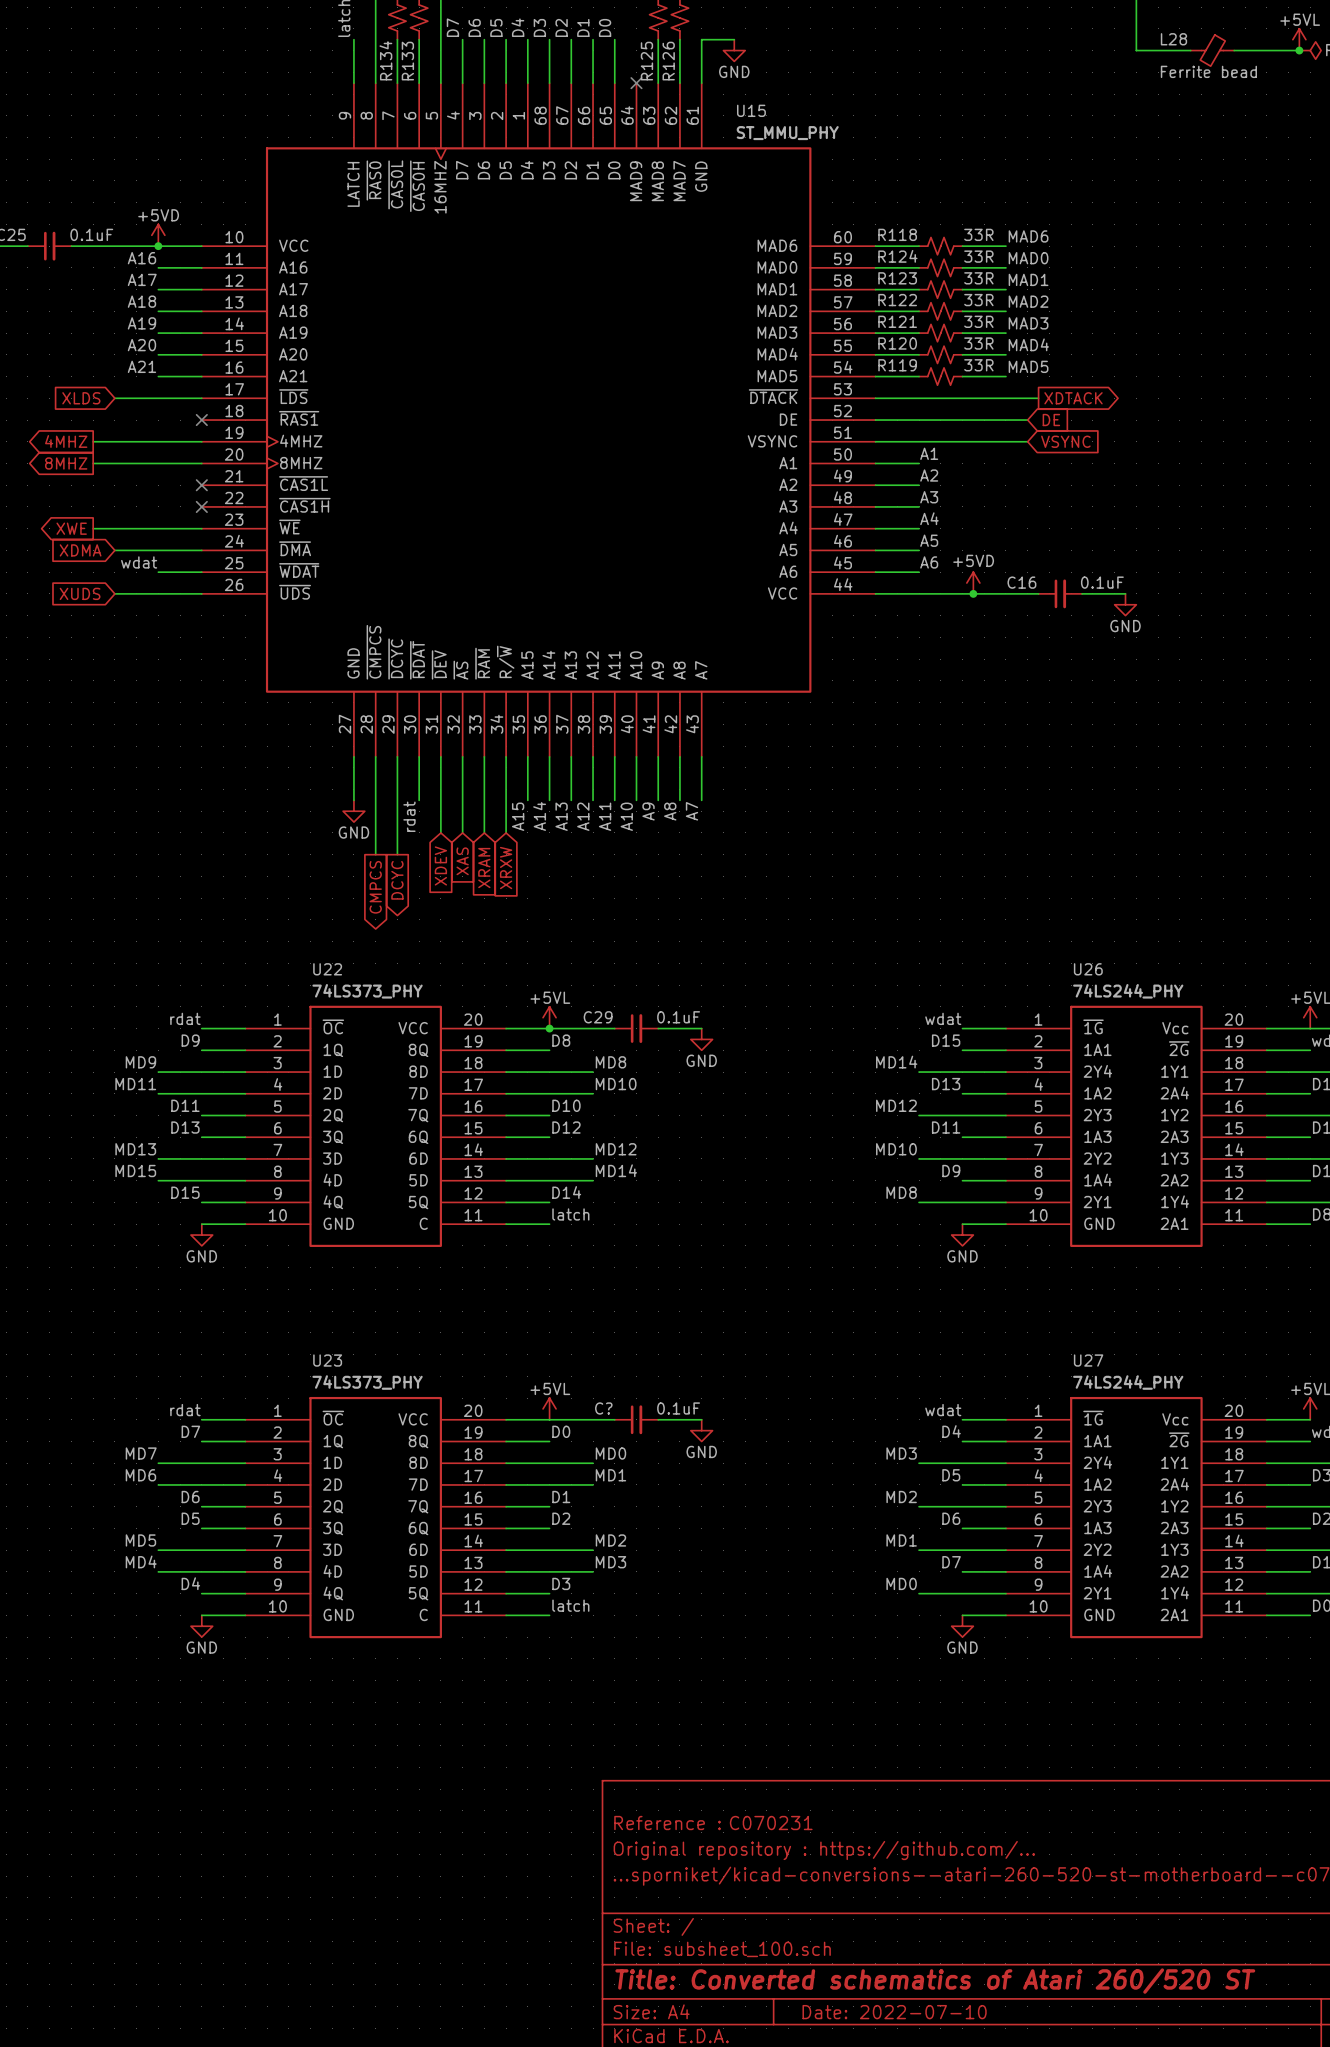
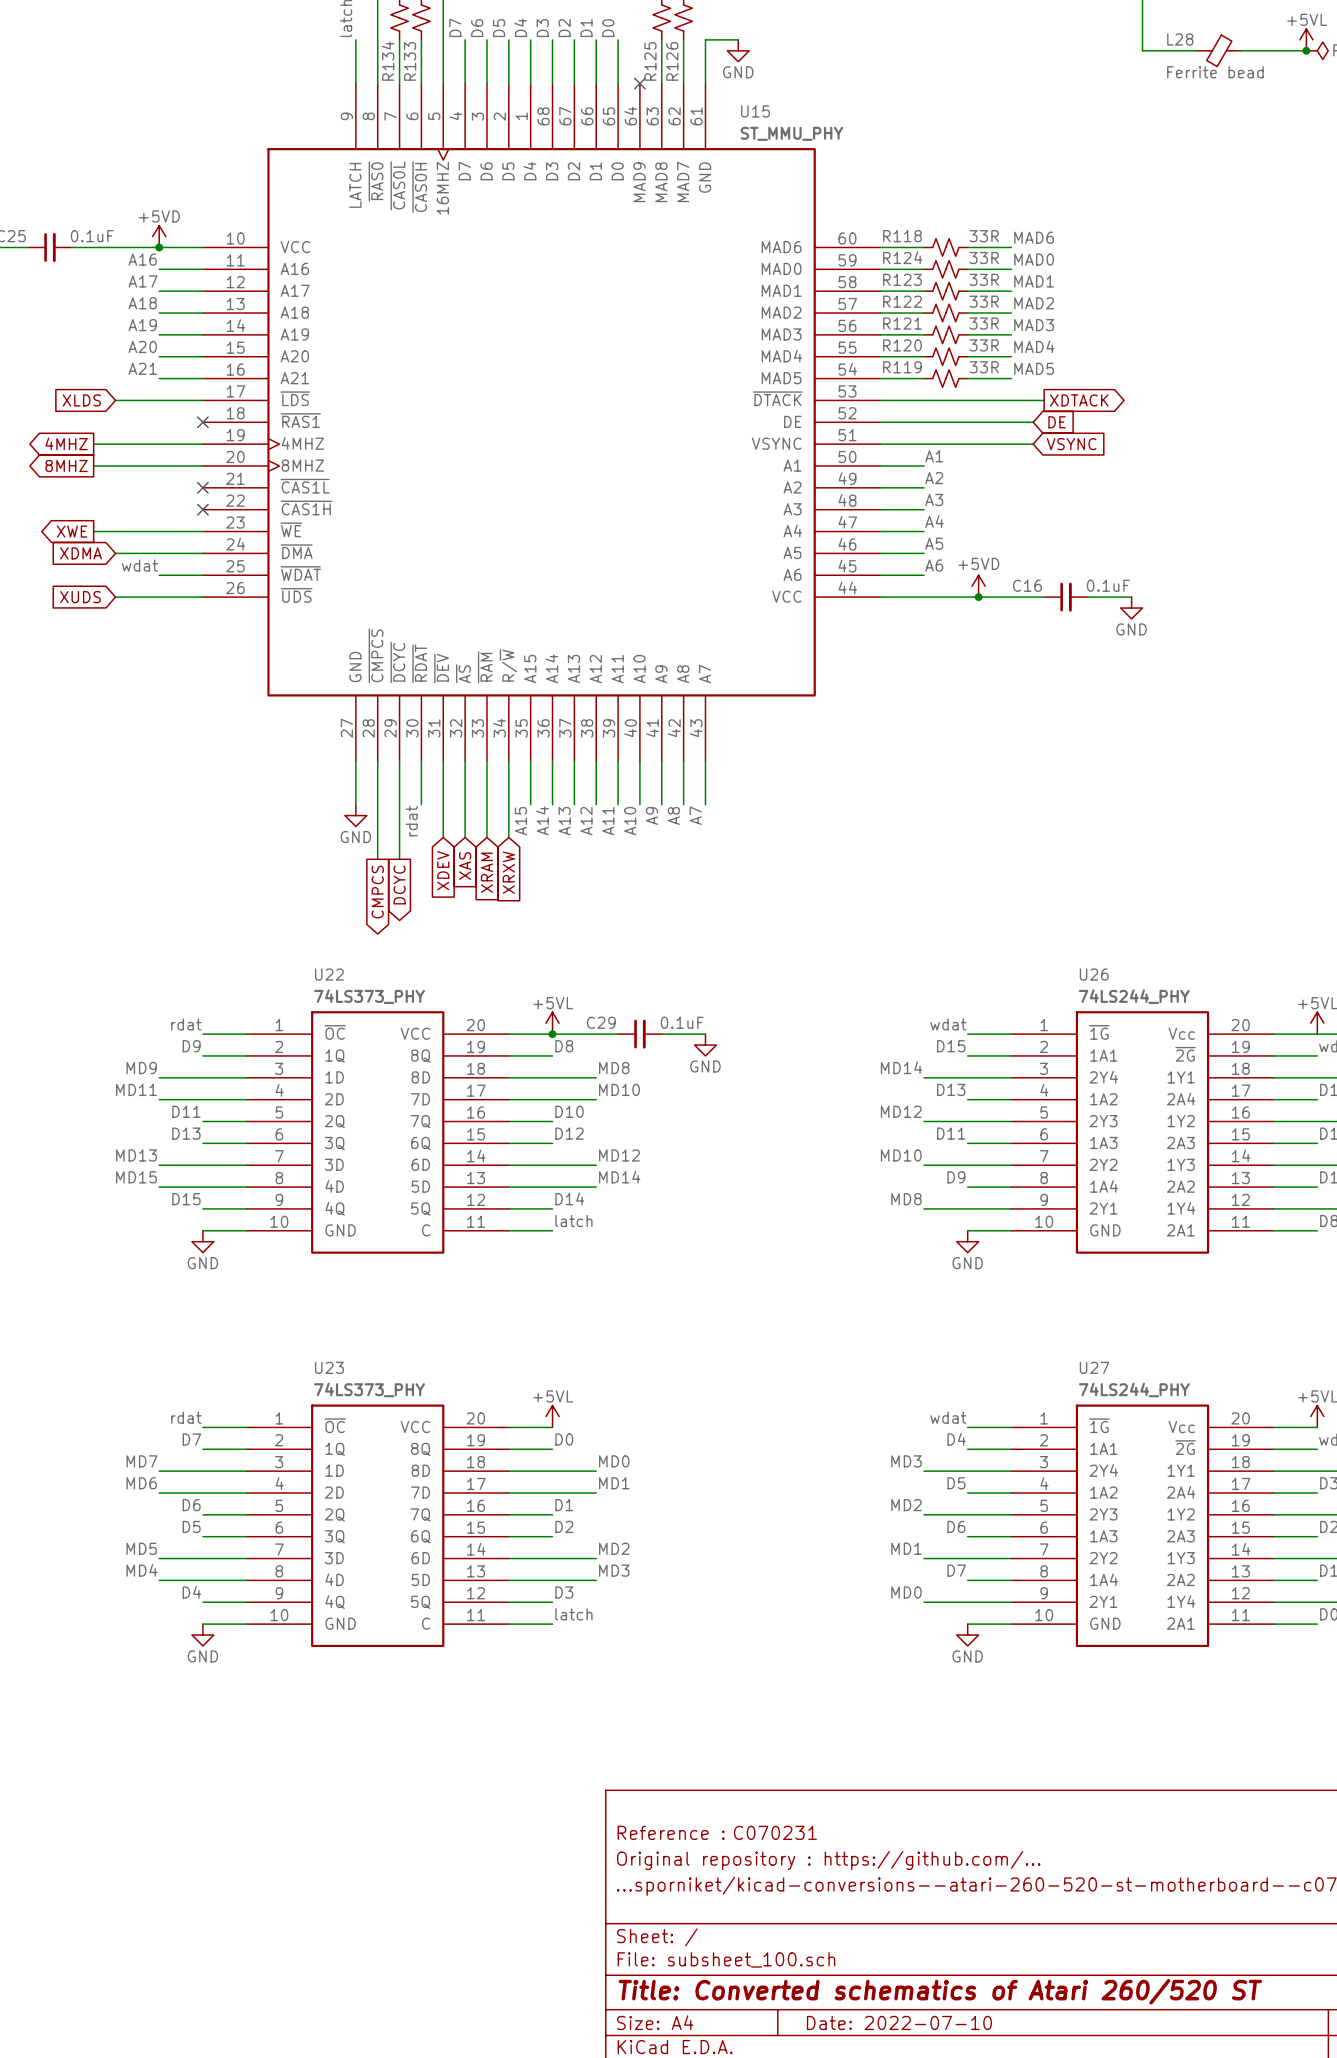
wire: (549, 1419) (614, 1419) -> none
C?: 0.1uF (636, 1419) -> none
wire: (658, 1419) (701, 1419) -> none
power symbol: GND (701, 1430) -> none

